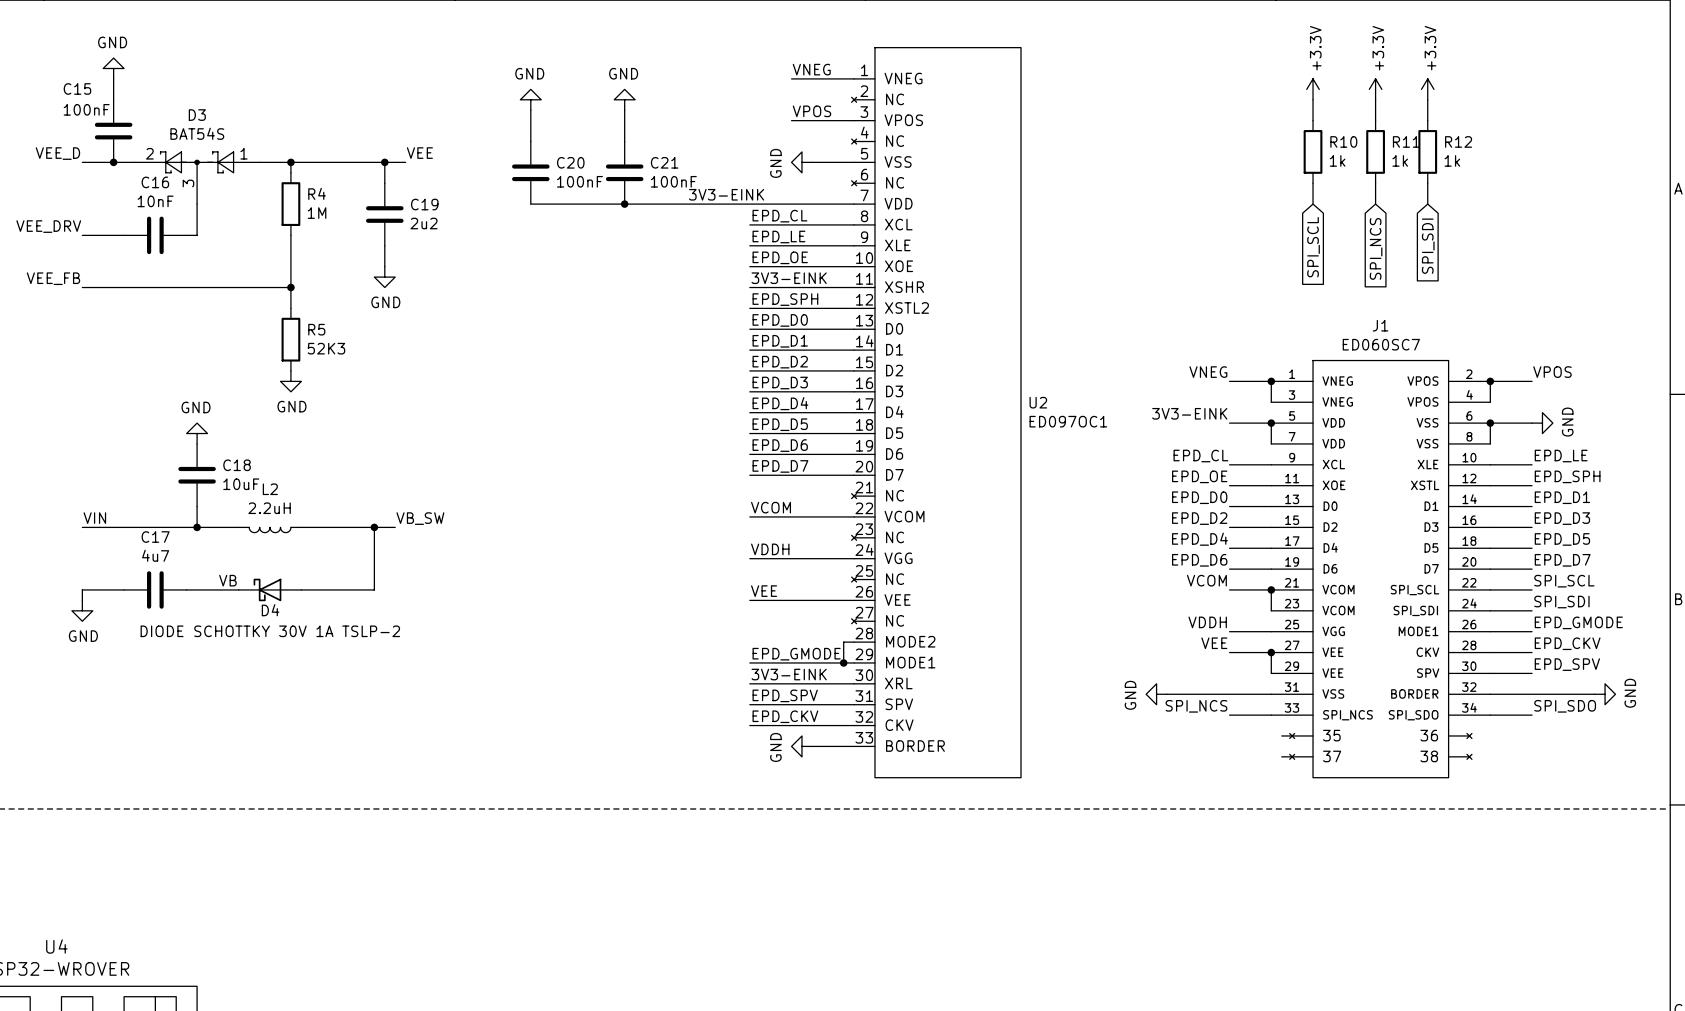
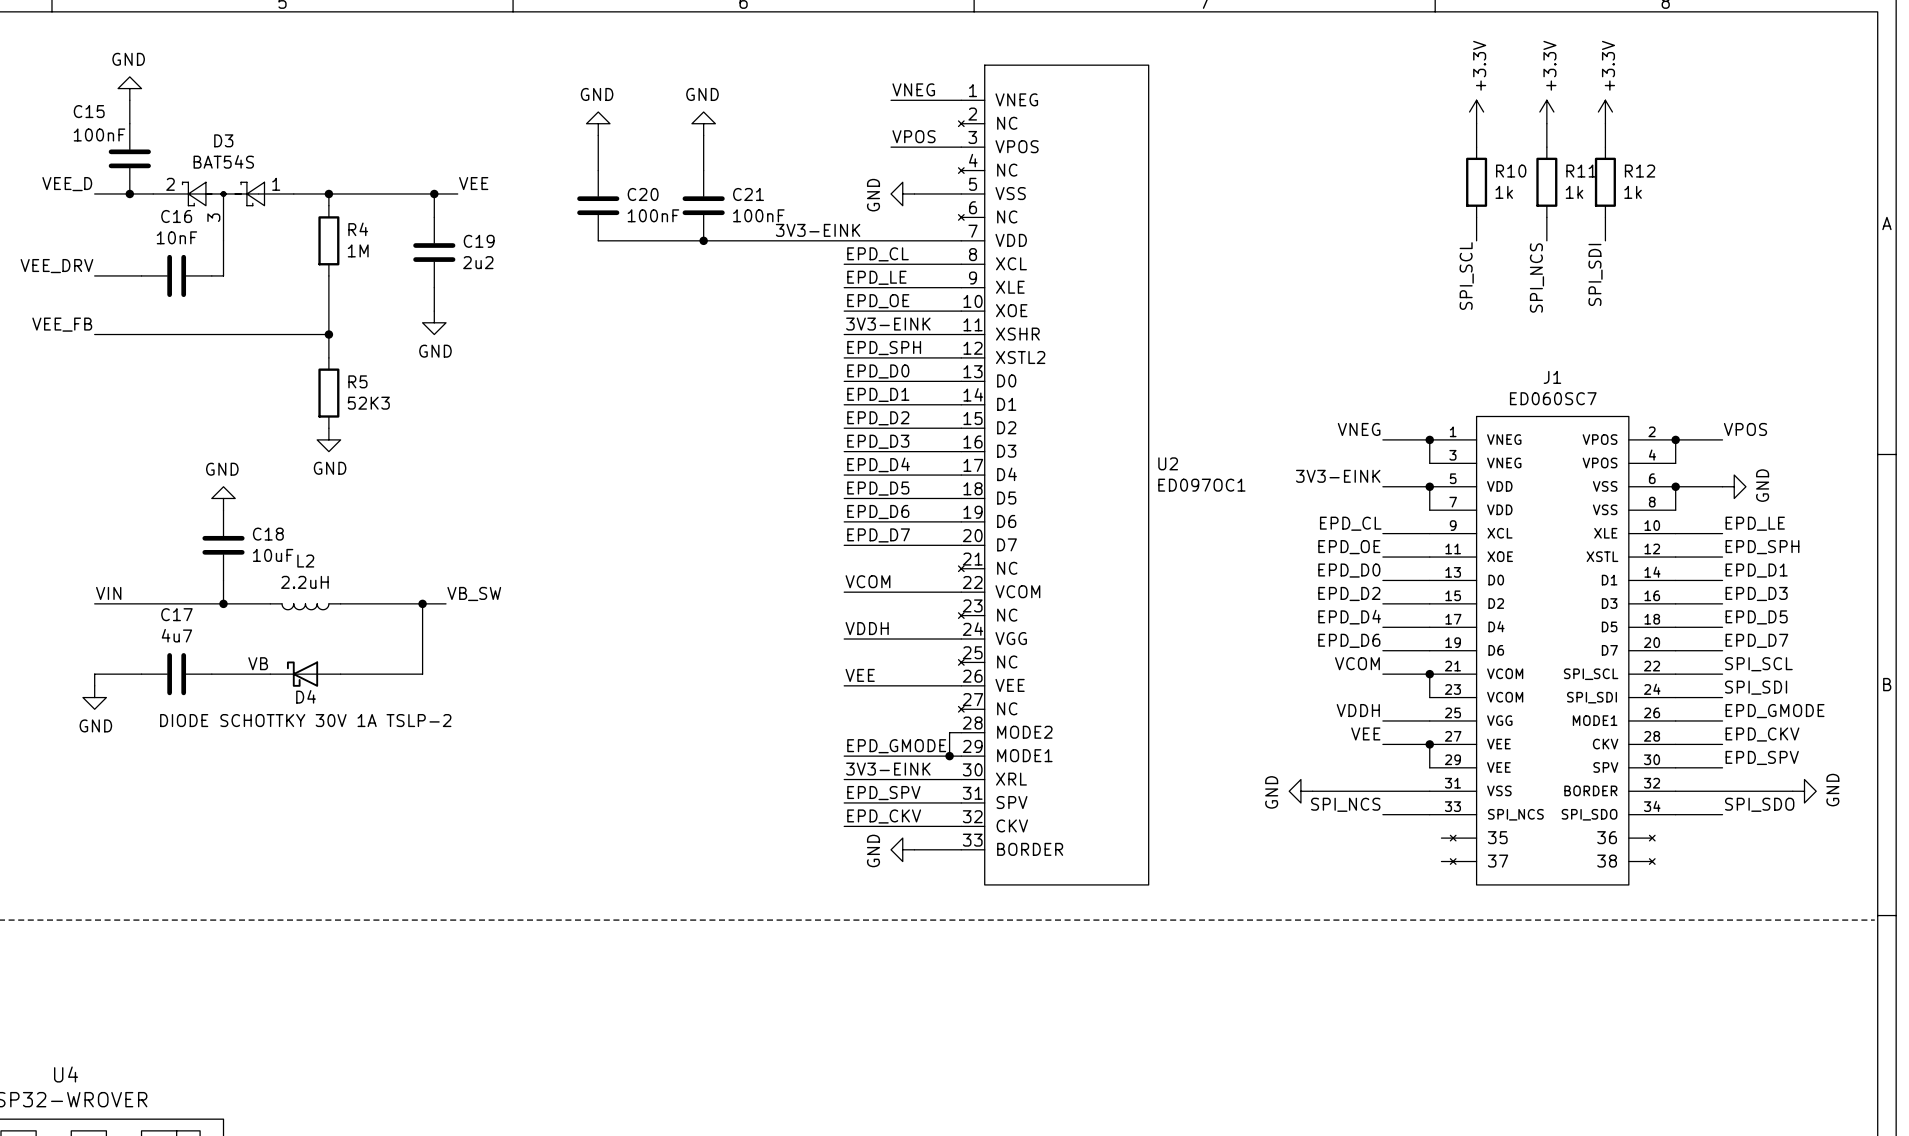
label: none -> SPI_SDI (1595, 274)
label: none -> SPI_SCL (1466, 276)
label: none -> SPI_NCS (1536, 278)
global label: SPI_SDI (1428, 246) -> none
global label: SPI_SCL (1313, 247) -> none
global label: SPI_NCS (1376, 248) -> none

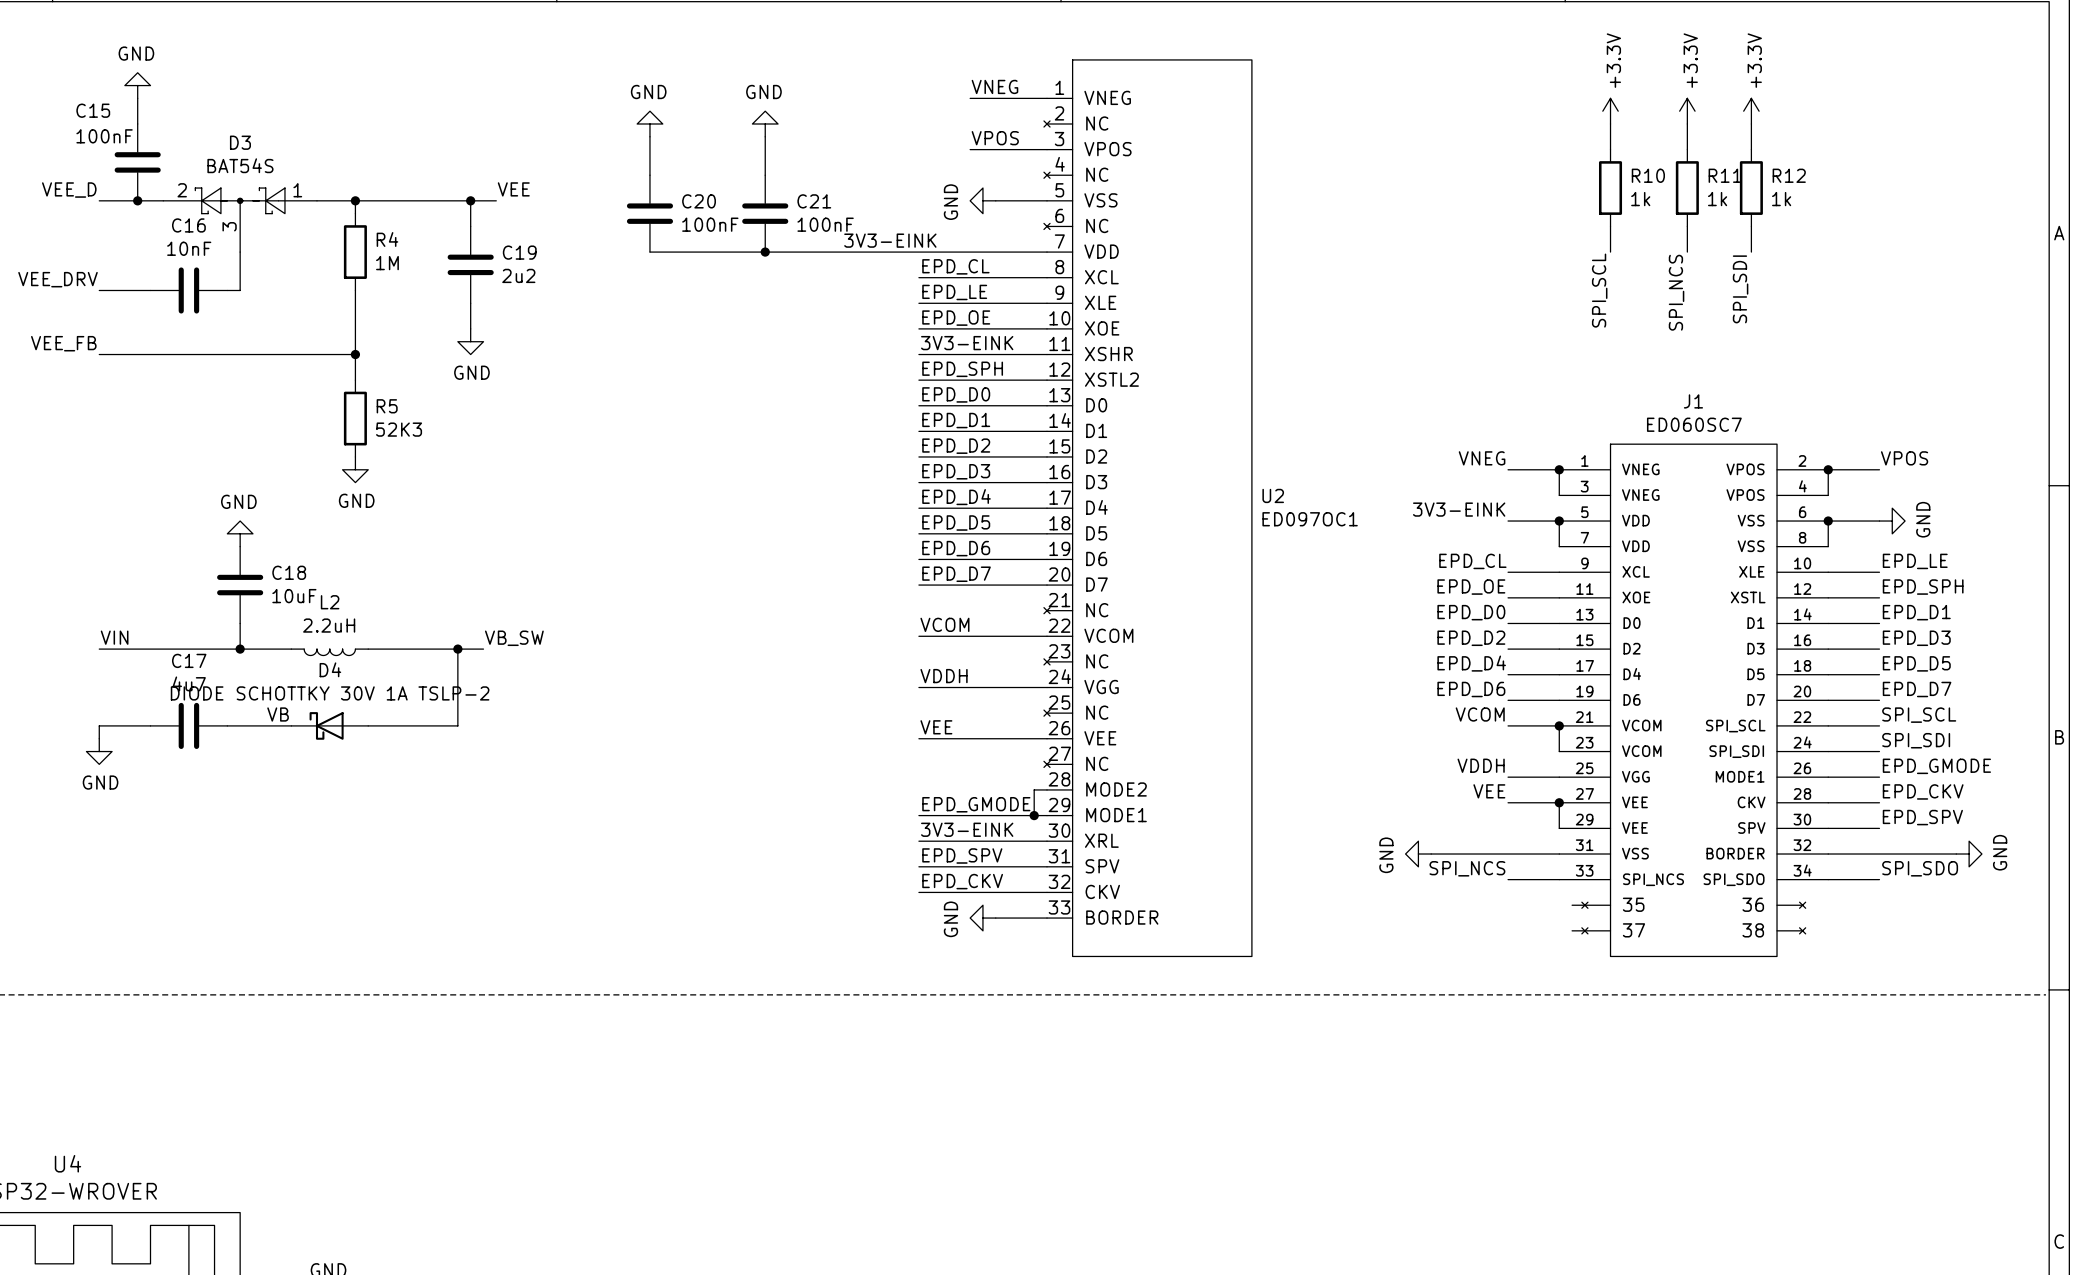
D4 name position: D4 (306, 696) -> D4 (330, 669)
D4 value position: DIODE SCHOTTKY 30V 1A TSLP-2 (305, 720) -> DIODE SCHOTTKY 30V 1A TSLP-2 (330, 693)

